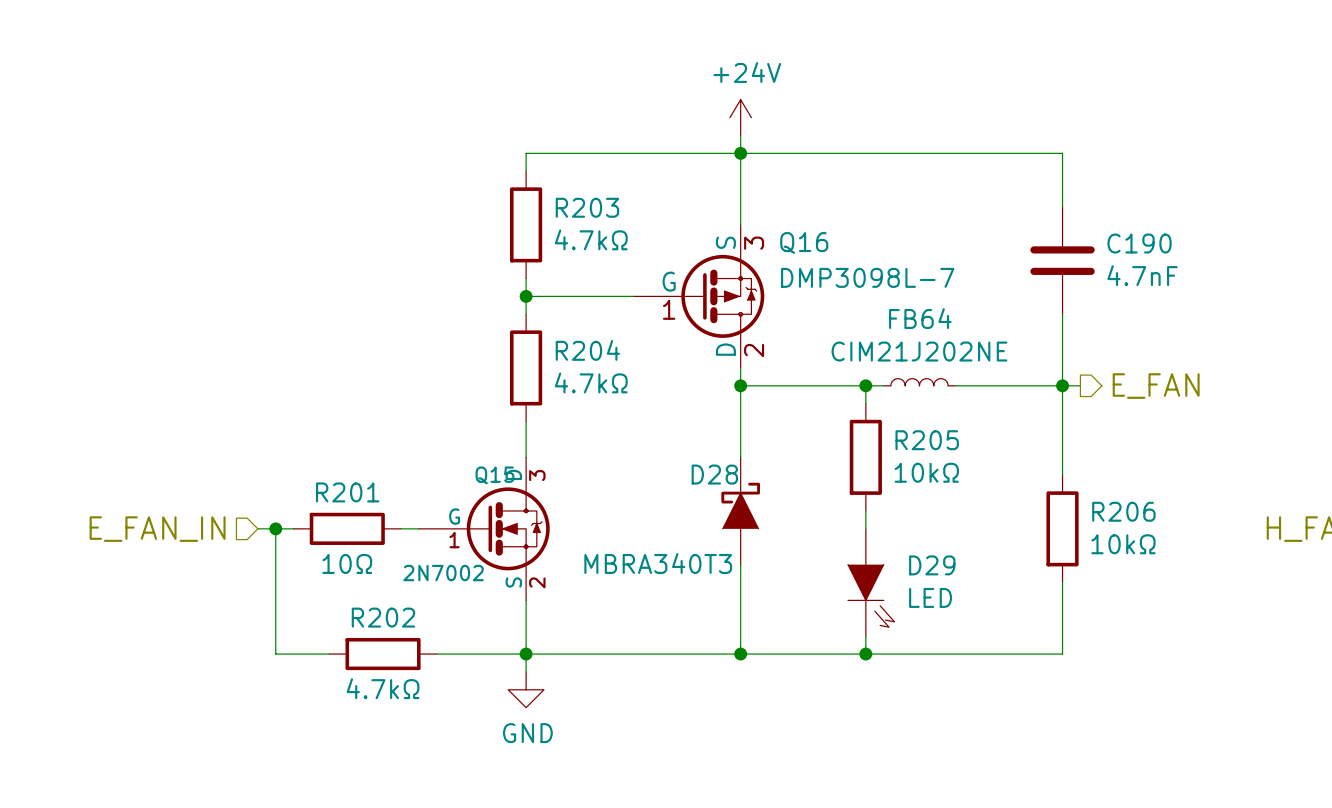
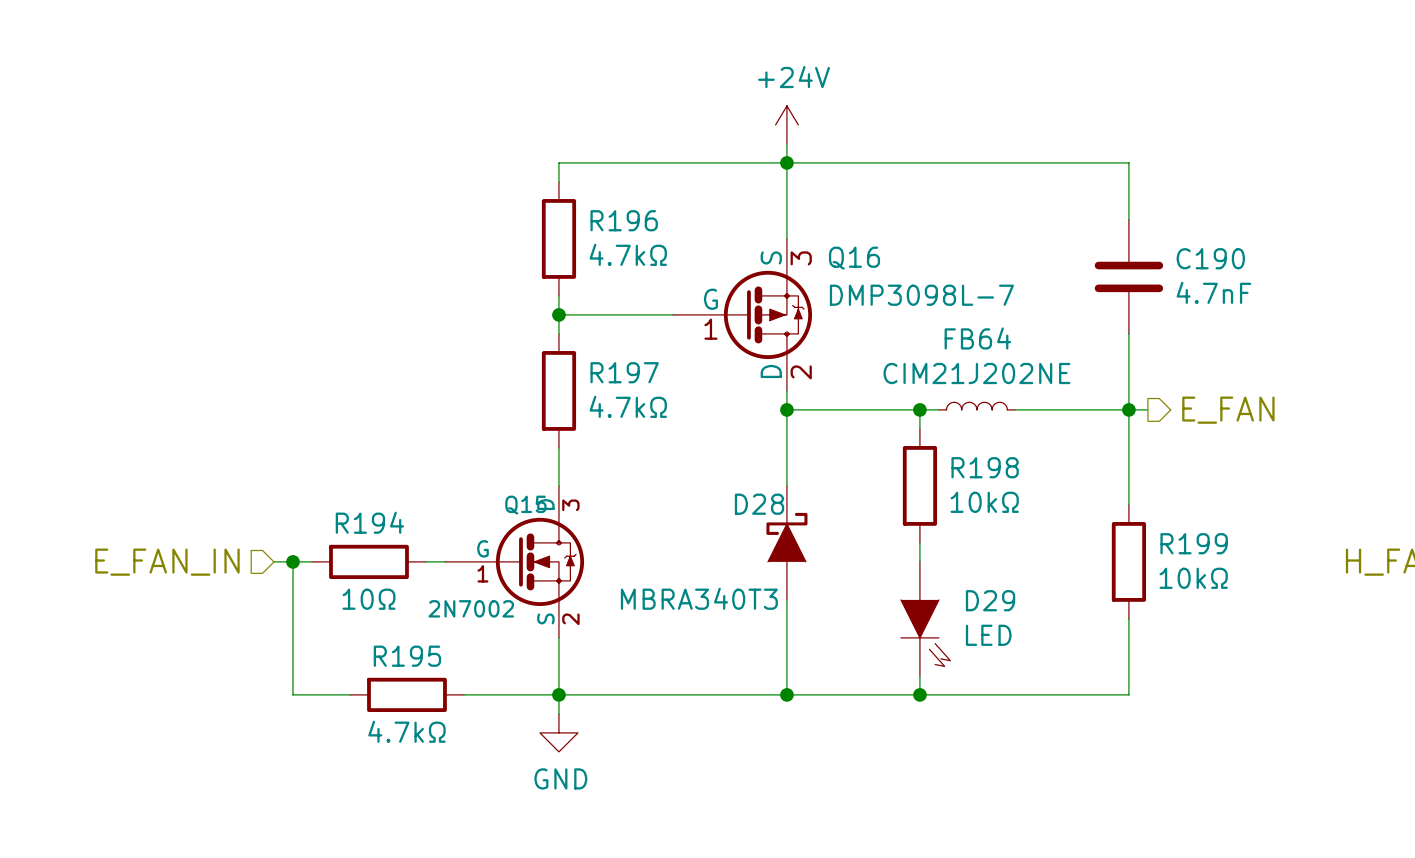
R203 name: R203 (587, 207) -> R196 (624, 220)
R204 name: R204 (587, 350) -> R197 (624, 372)
R205 name: R205 (927, 440) -> R198 (985, 467)
R201 name: R201 (347, 492) -> R194 (369, 522)
R206 name: R206 (1123, 511) -> R199 (1194, 543)
R202 name: R202 (383, 617) -> R195 (407, 656)

